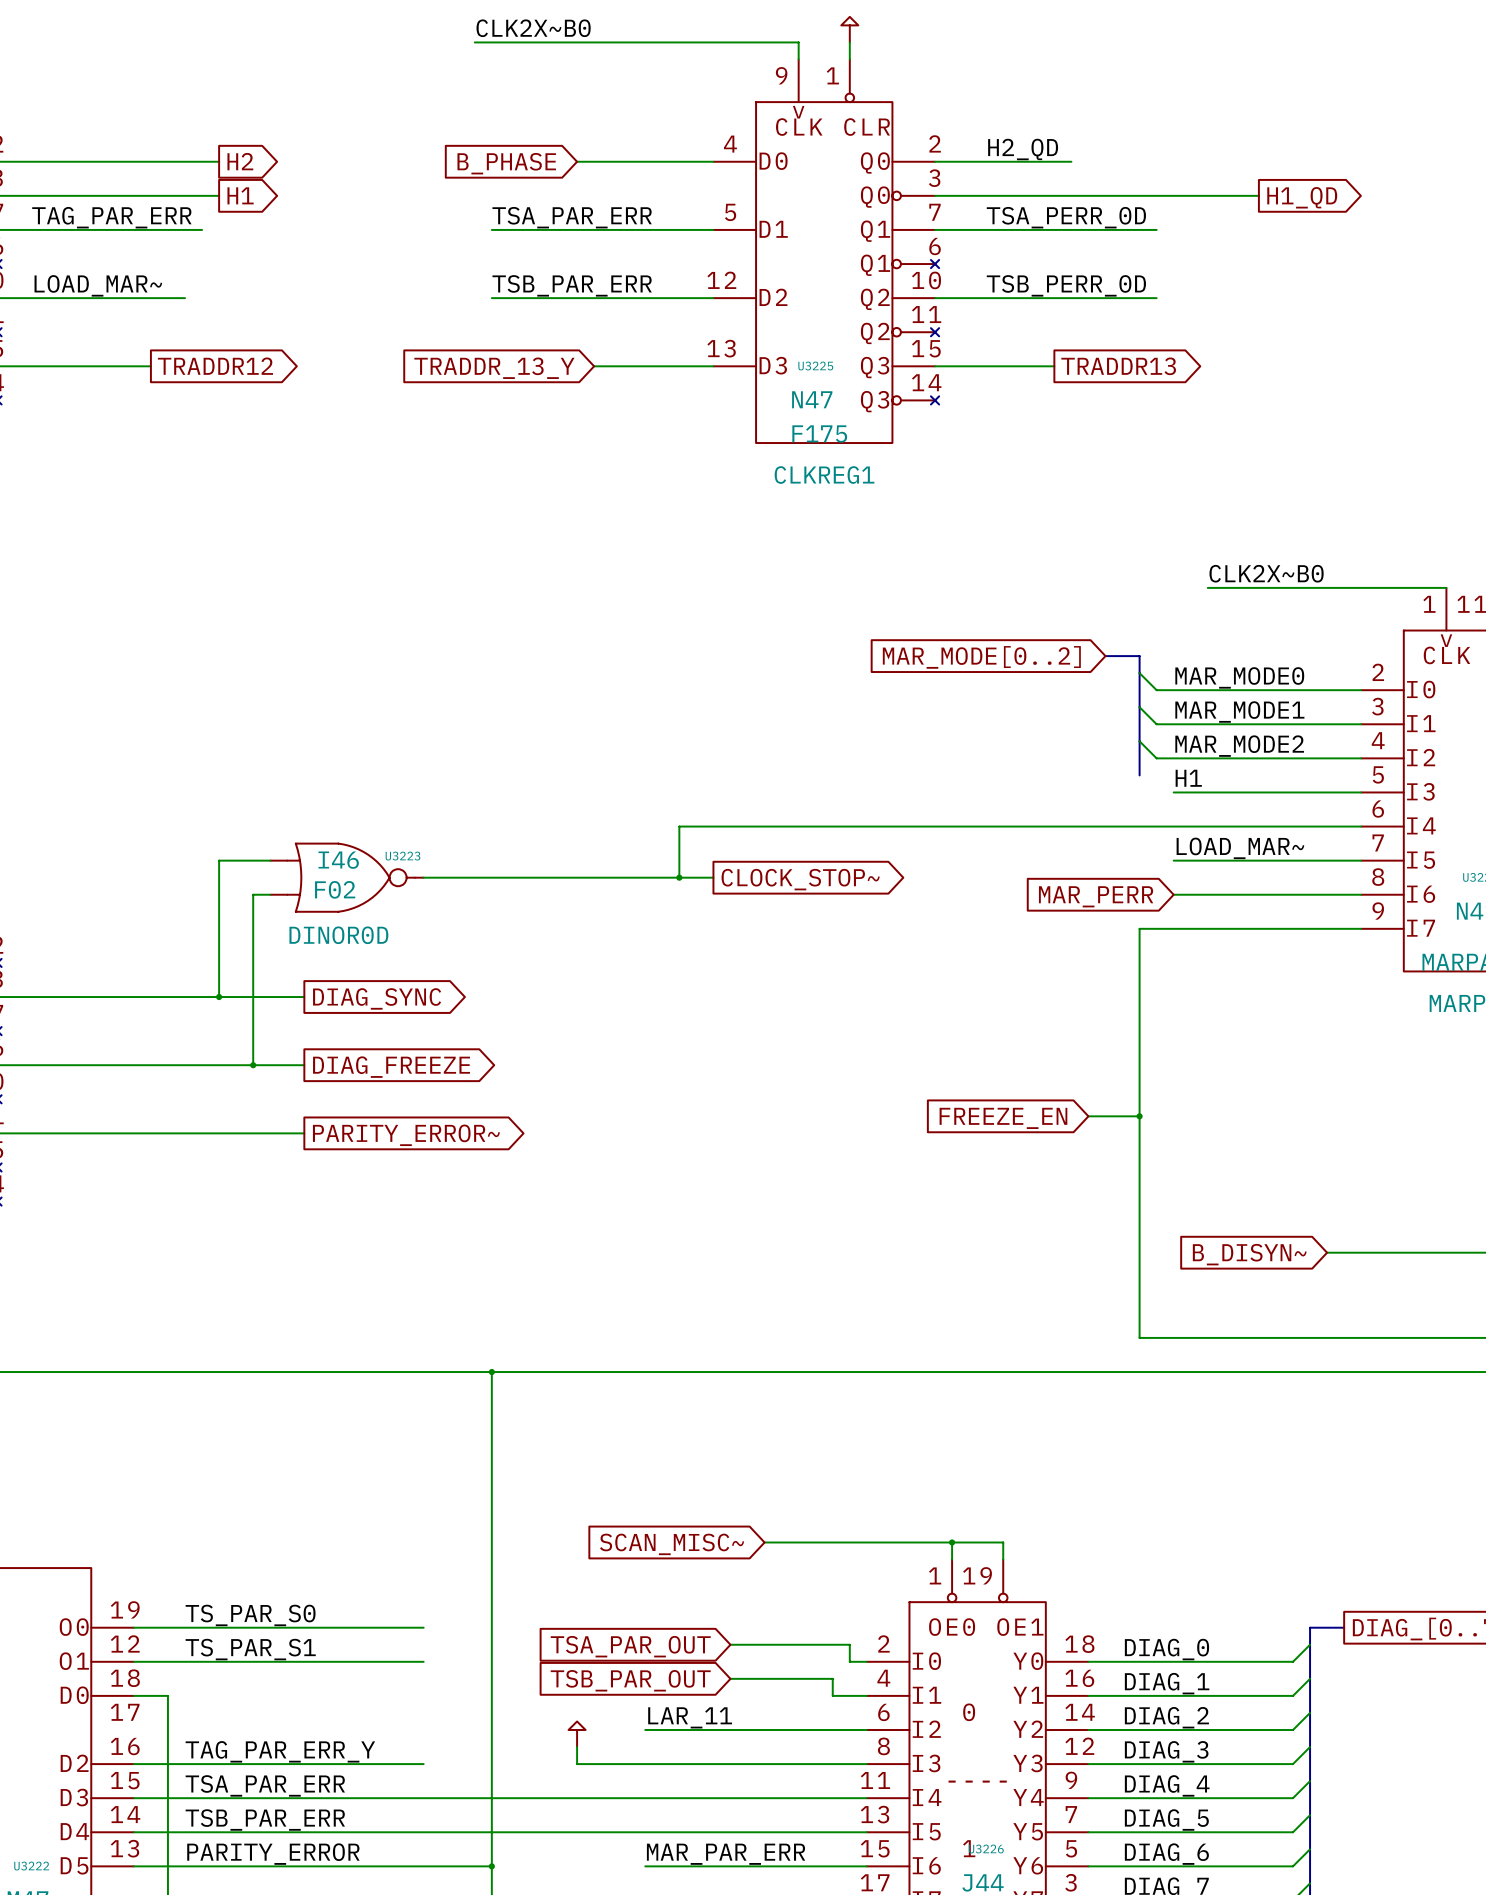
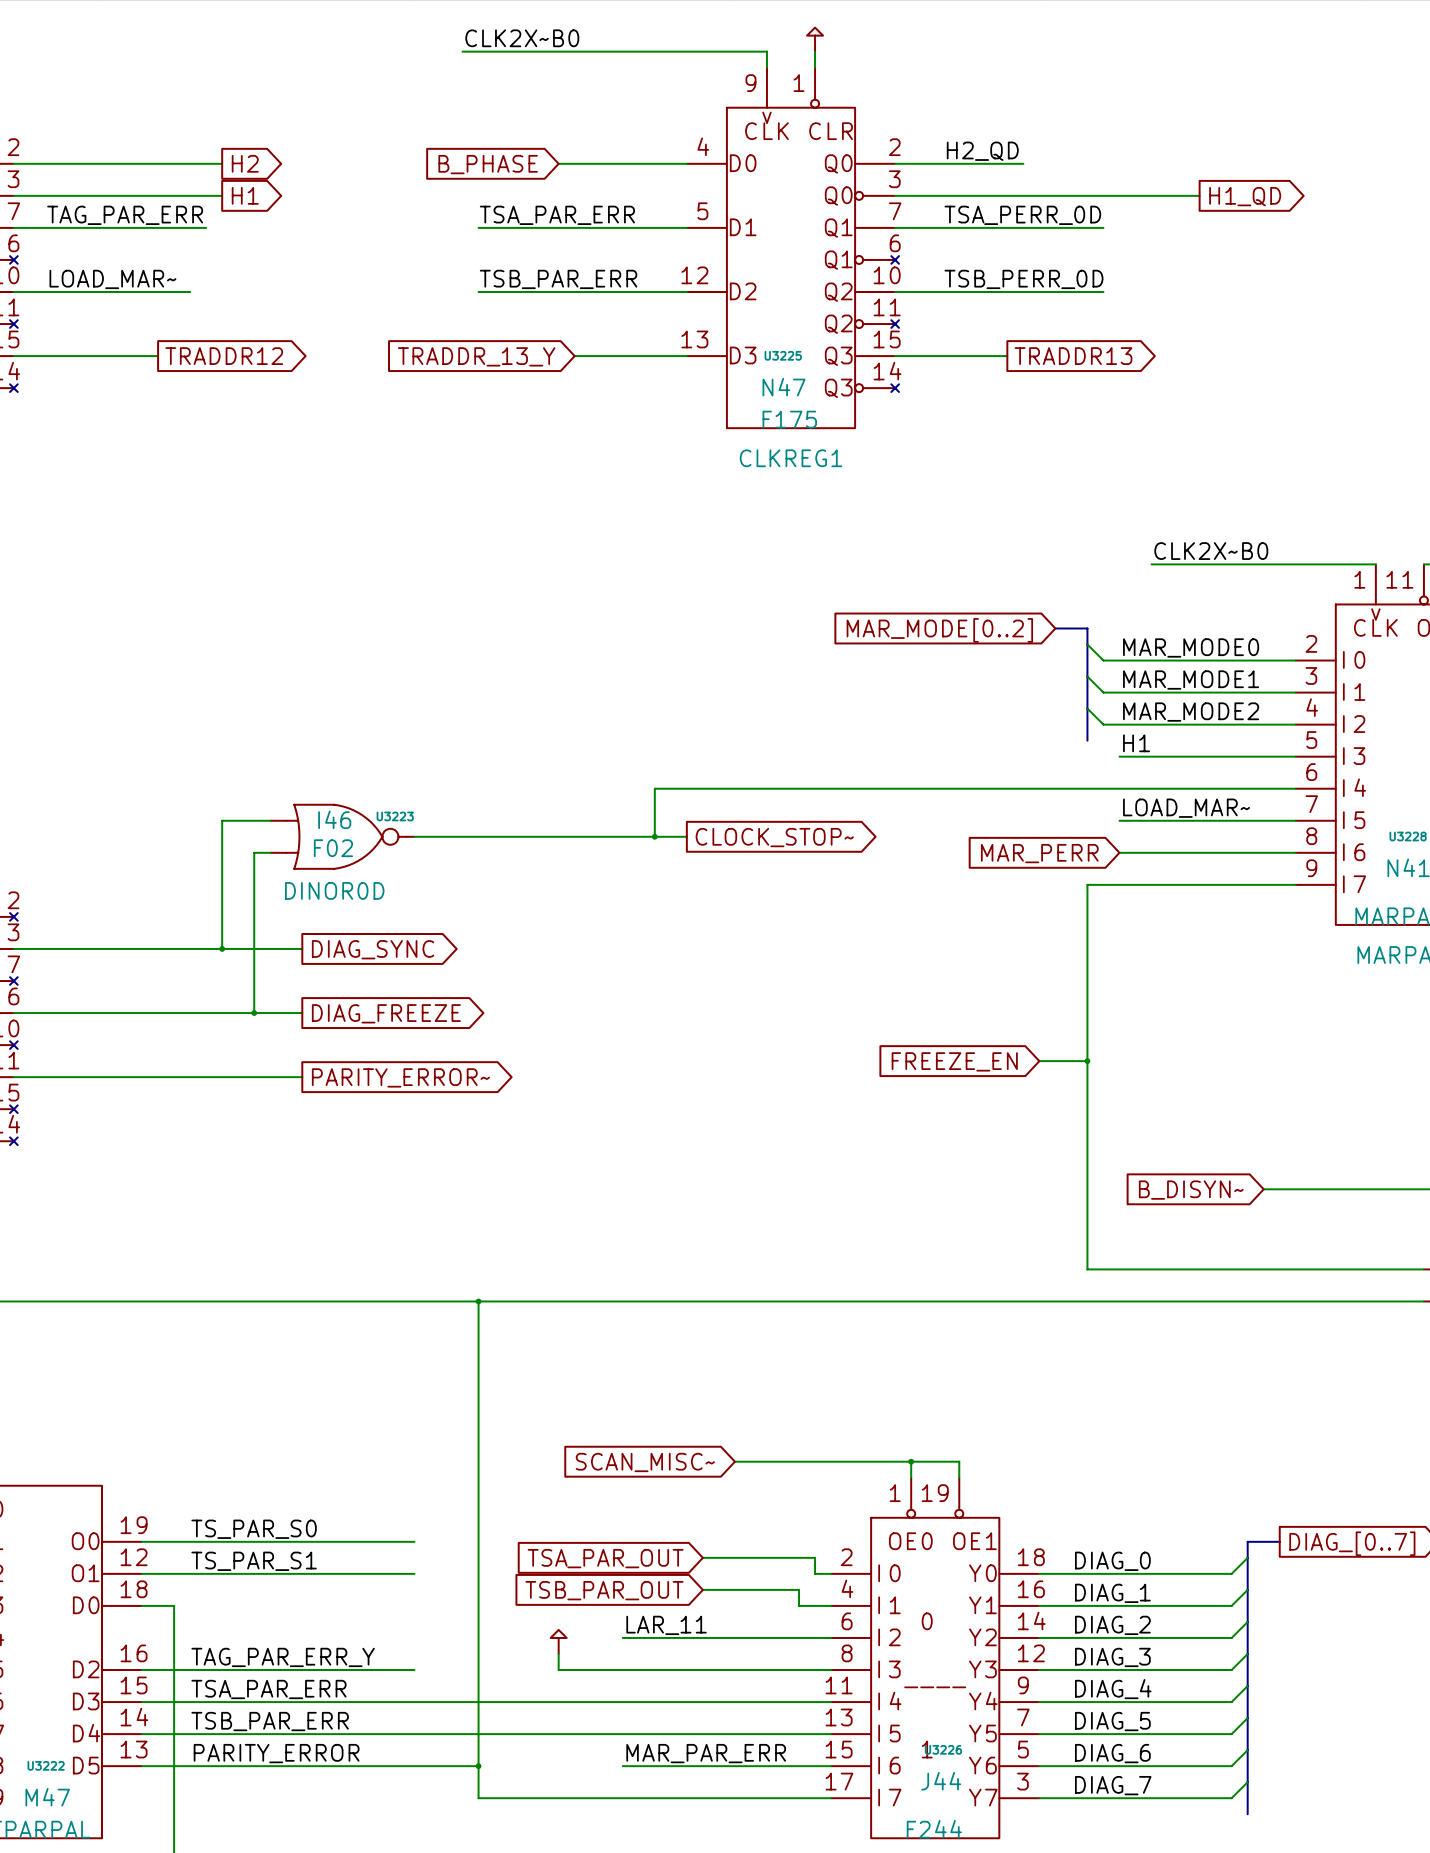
U3222 text: 1 (116, 1712) -> none
U3222 text: 7 (133, 1712) -> none

